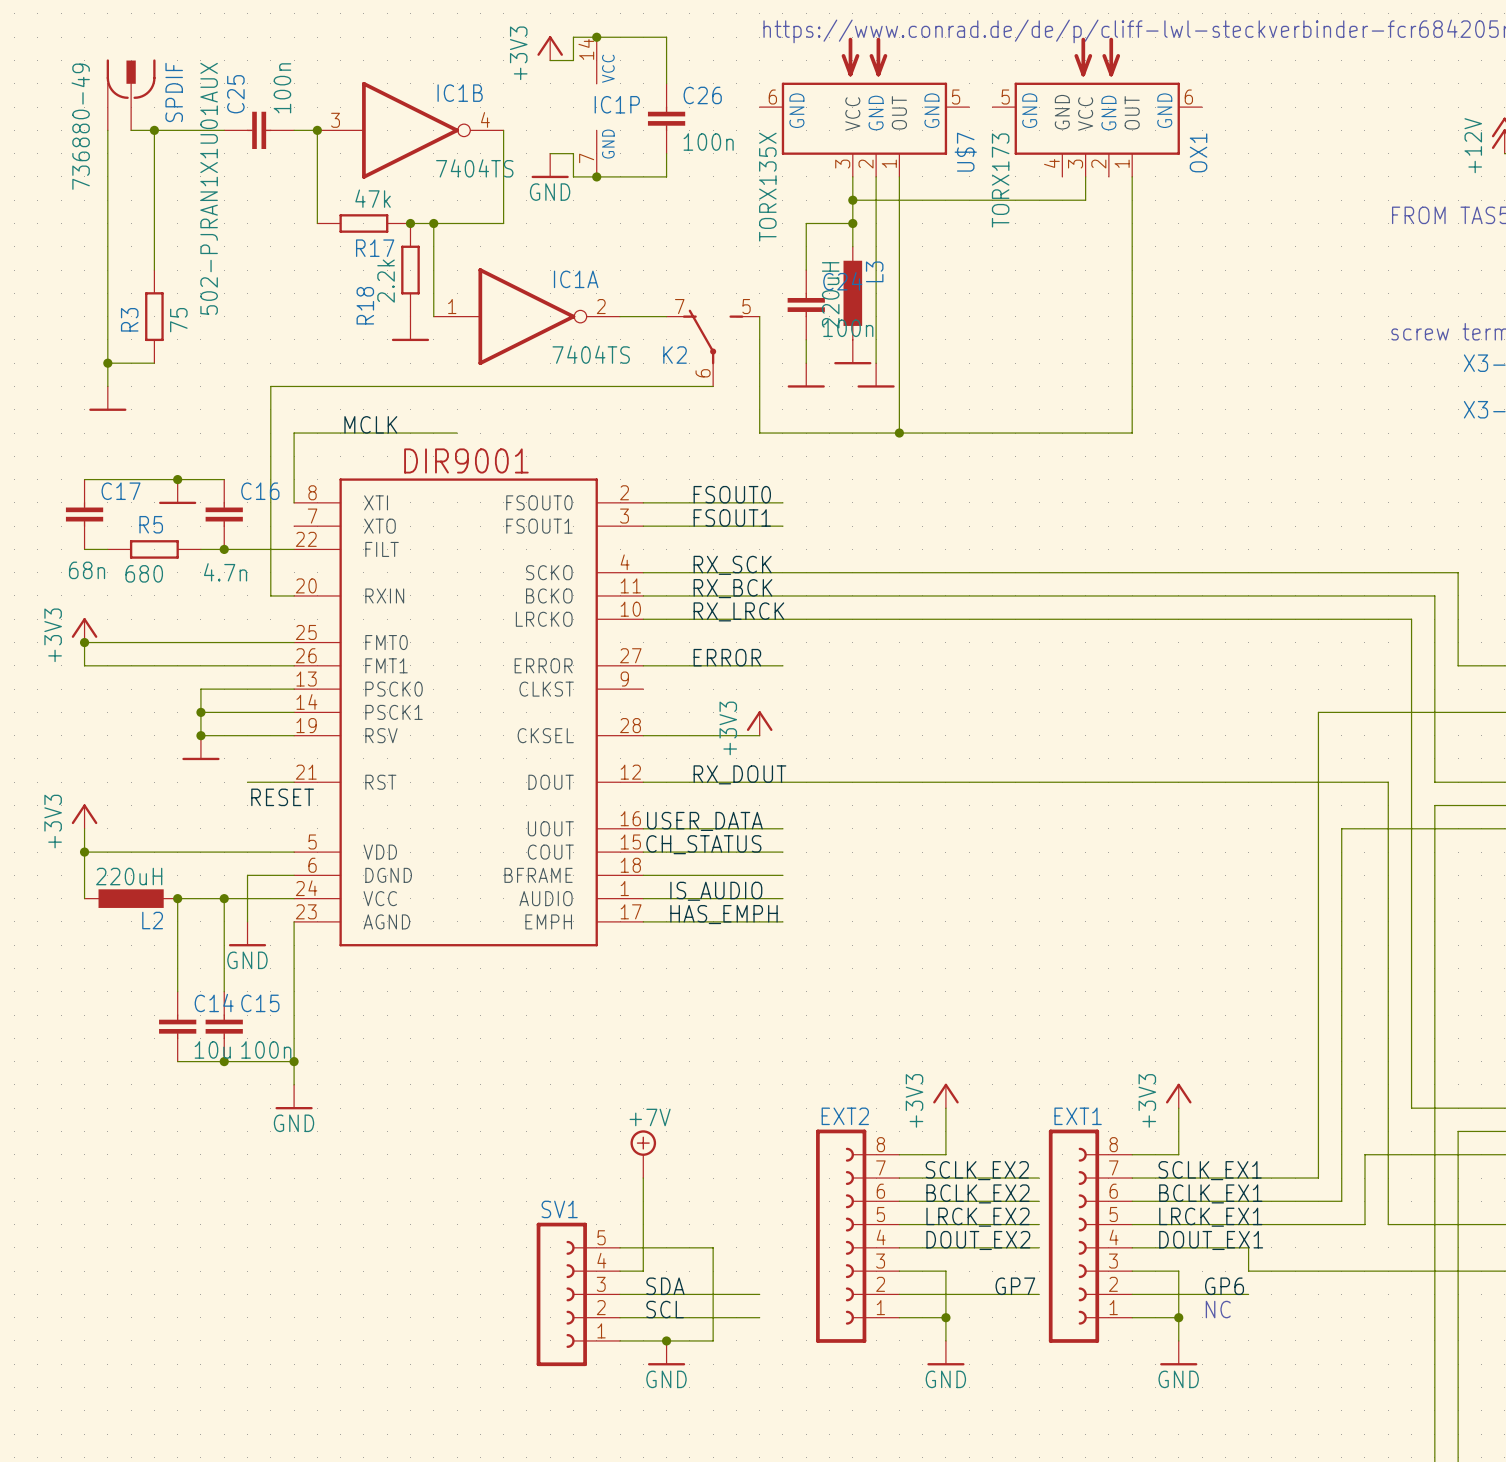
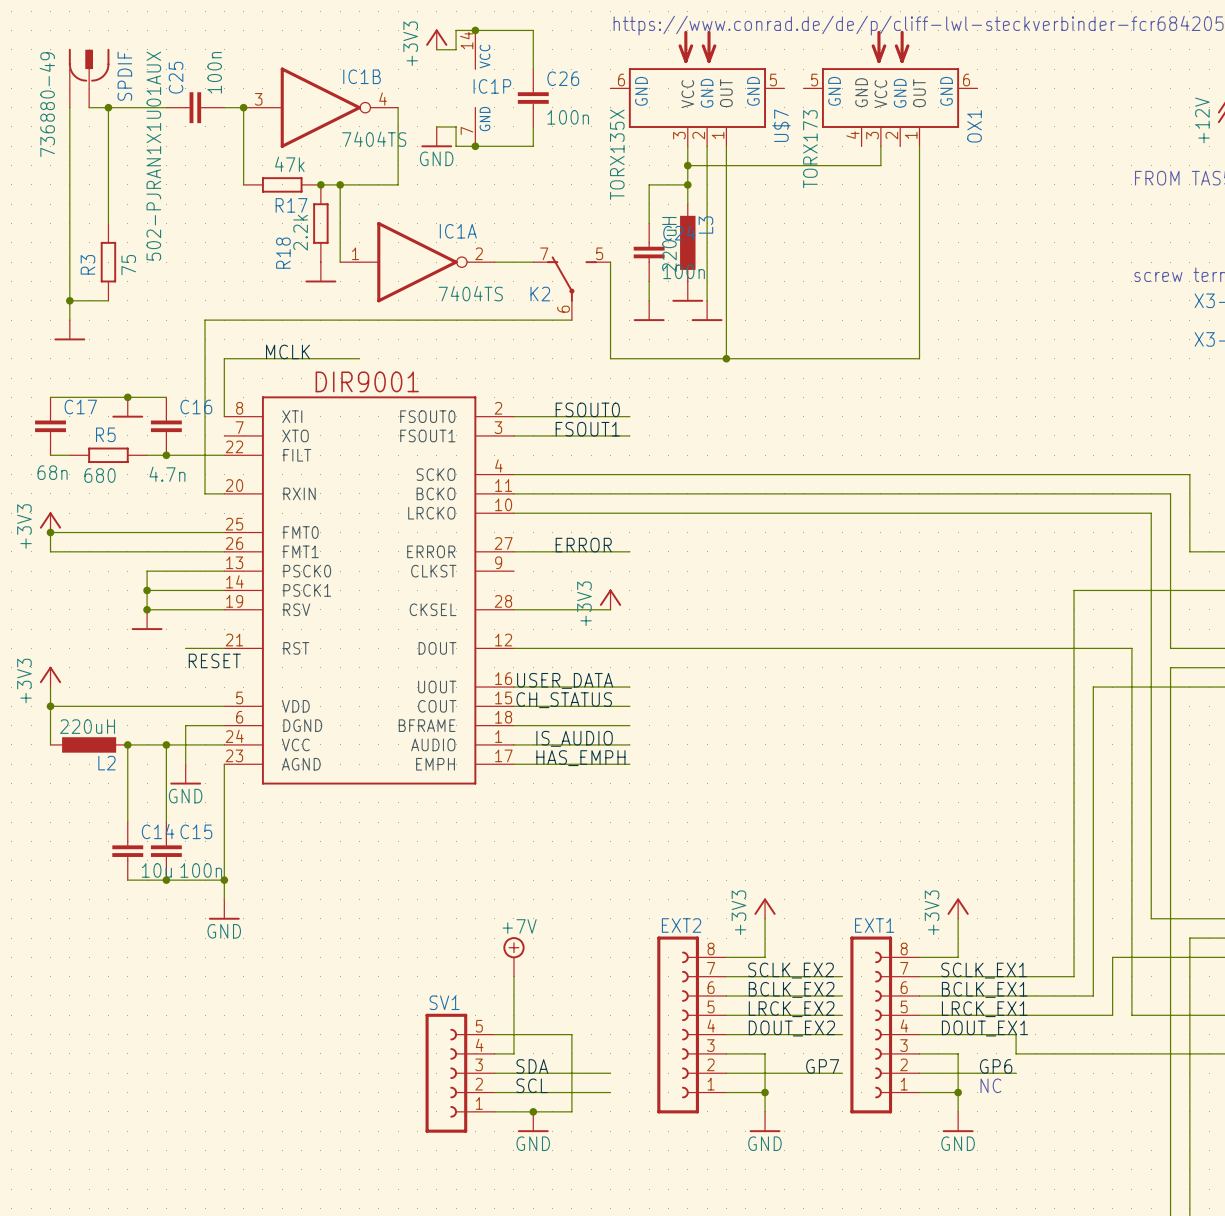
label: RX_SCK (732, 565) -> none
label: RX_BCK (732, 588) -> none
label: RX_LRCK (738, 611) -> none
label: RX_DOUT (739, 774) -> none

